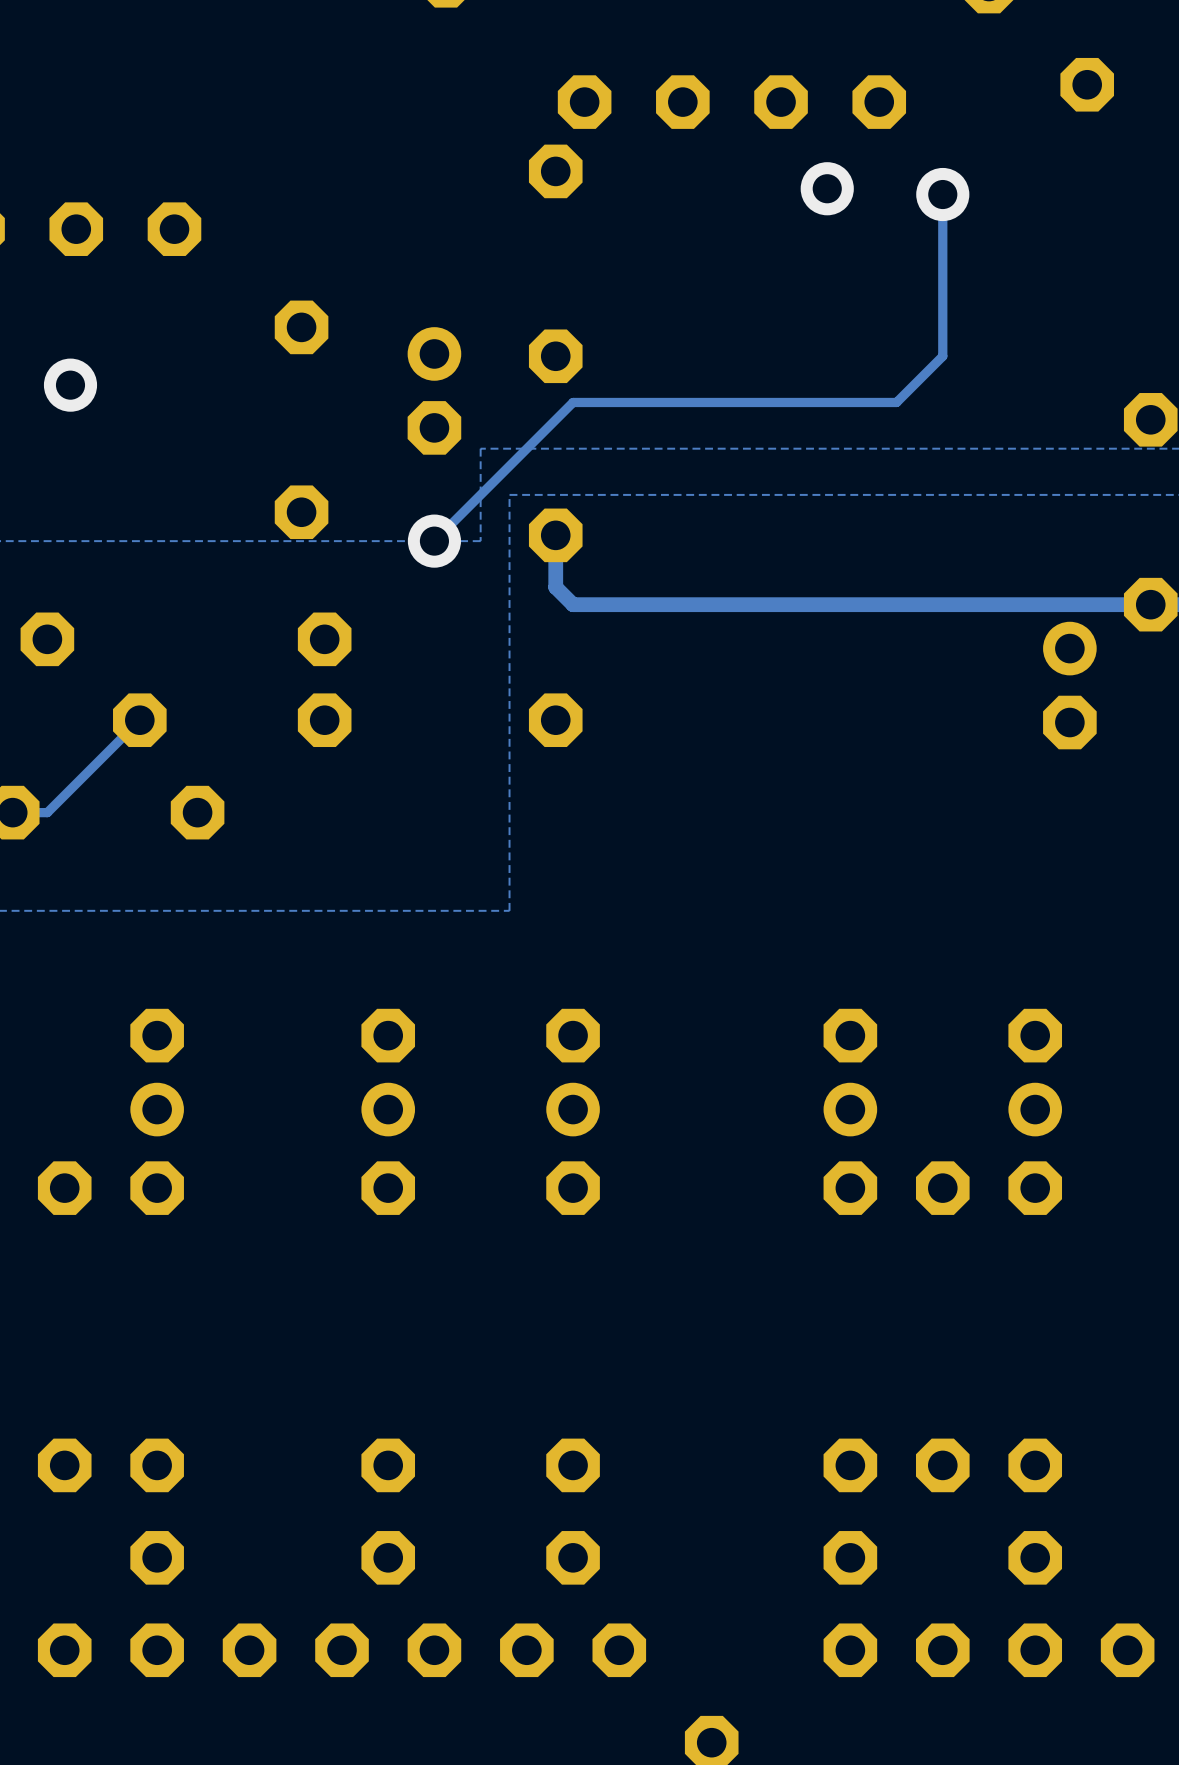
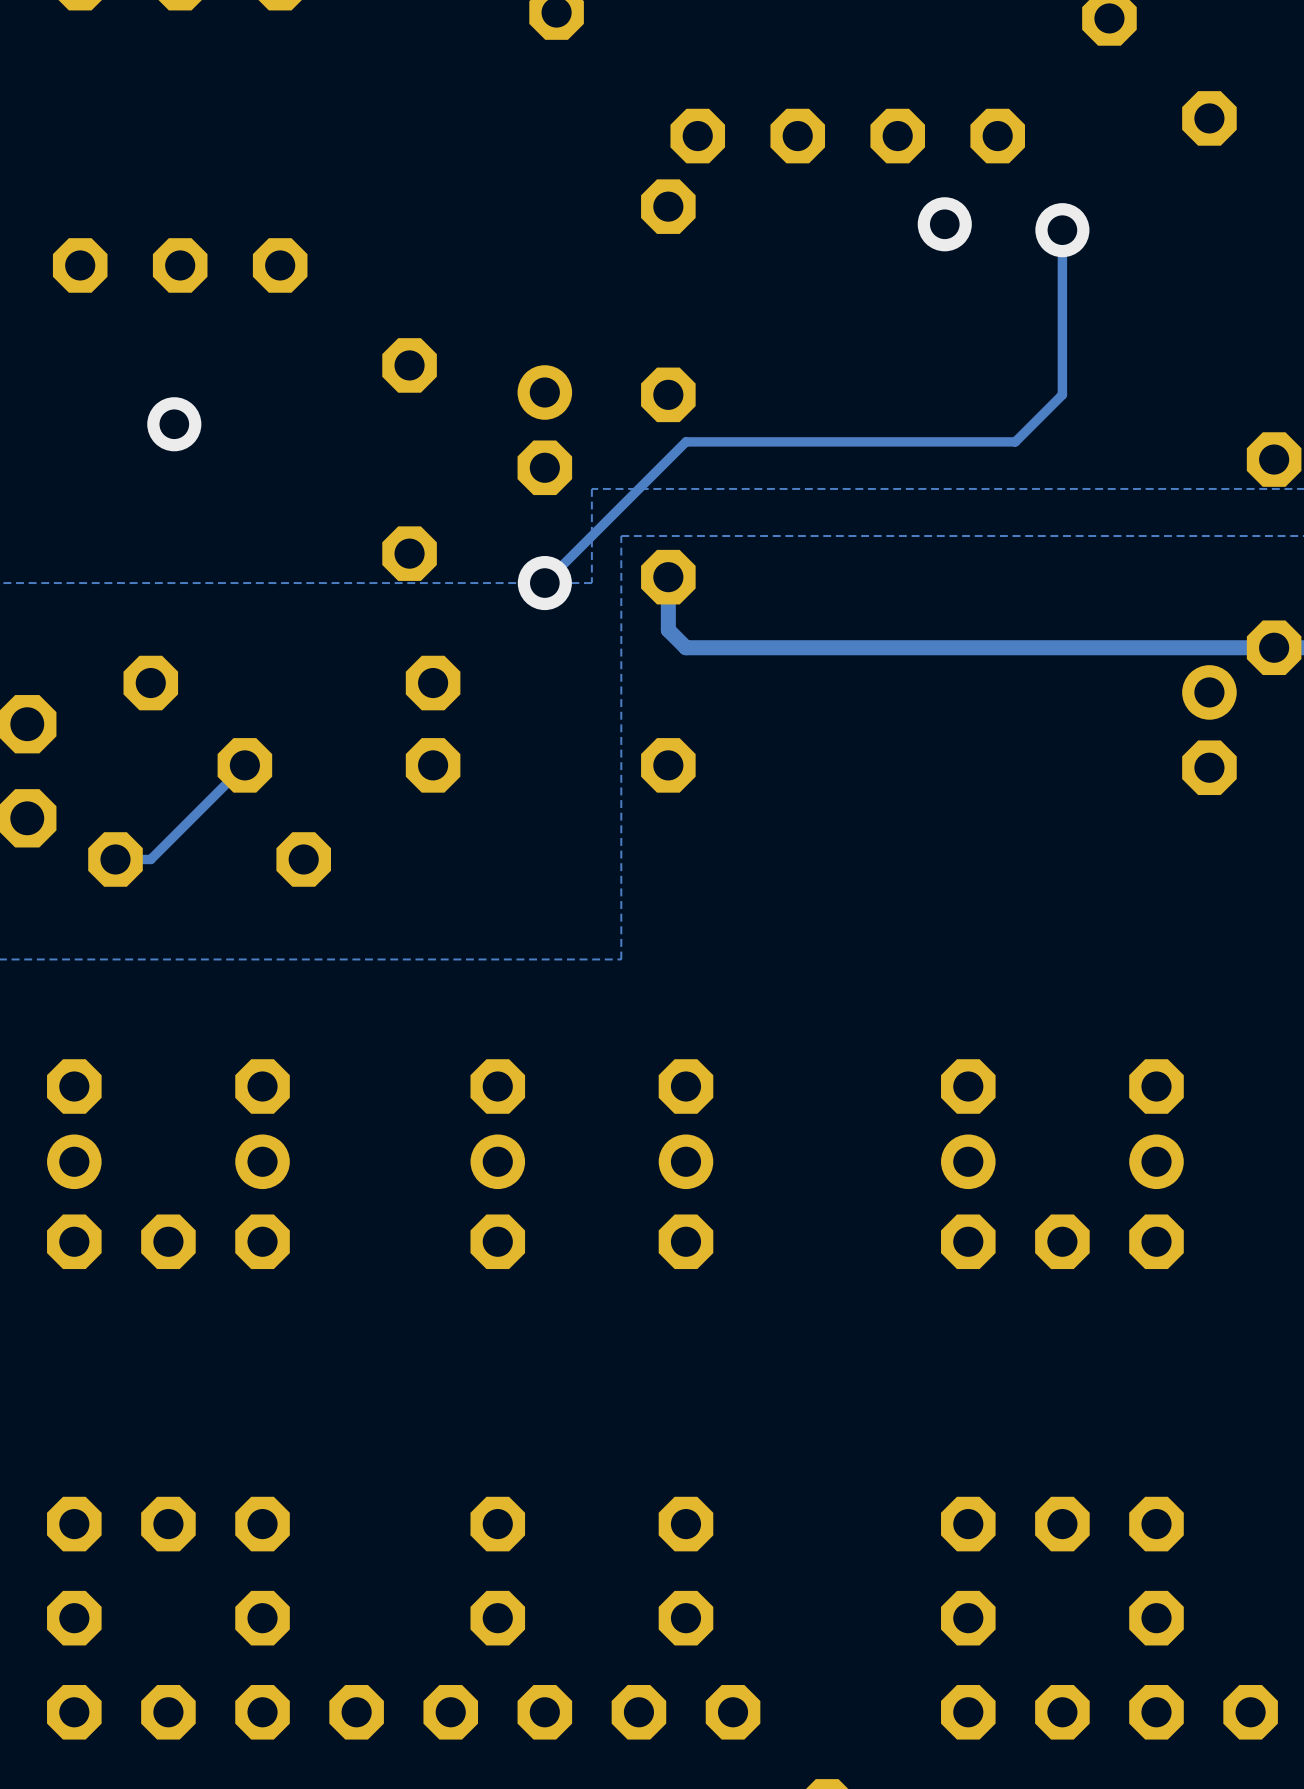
part position: (1069, 685) -> (1209, 730)

